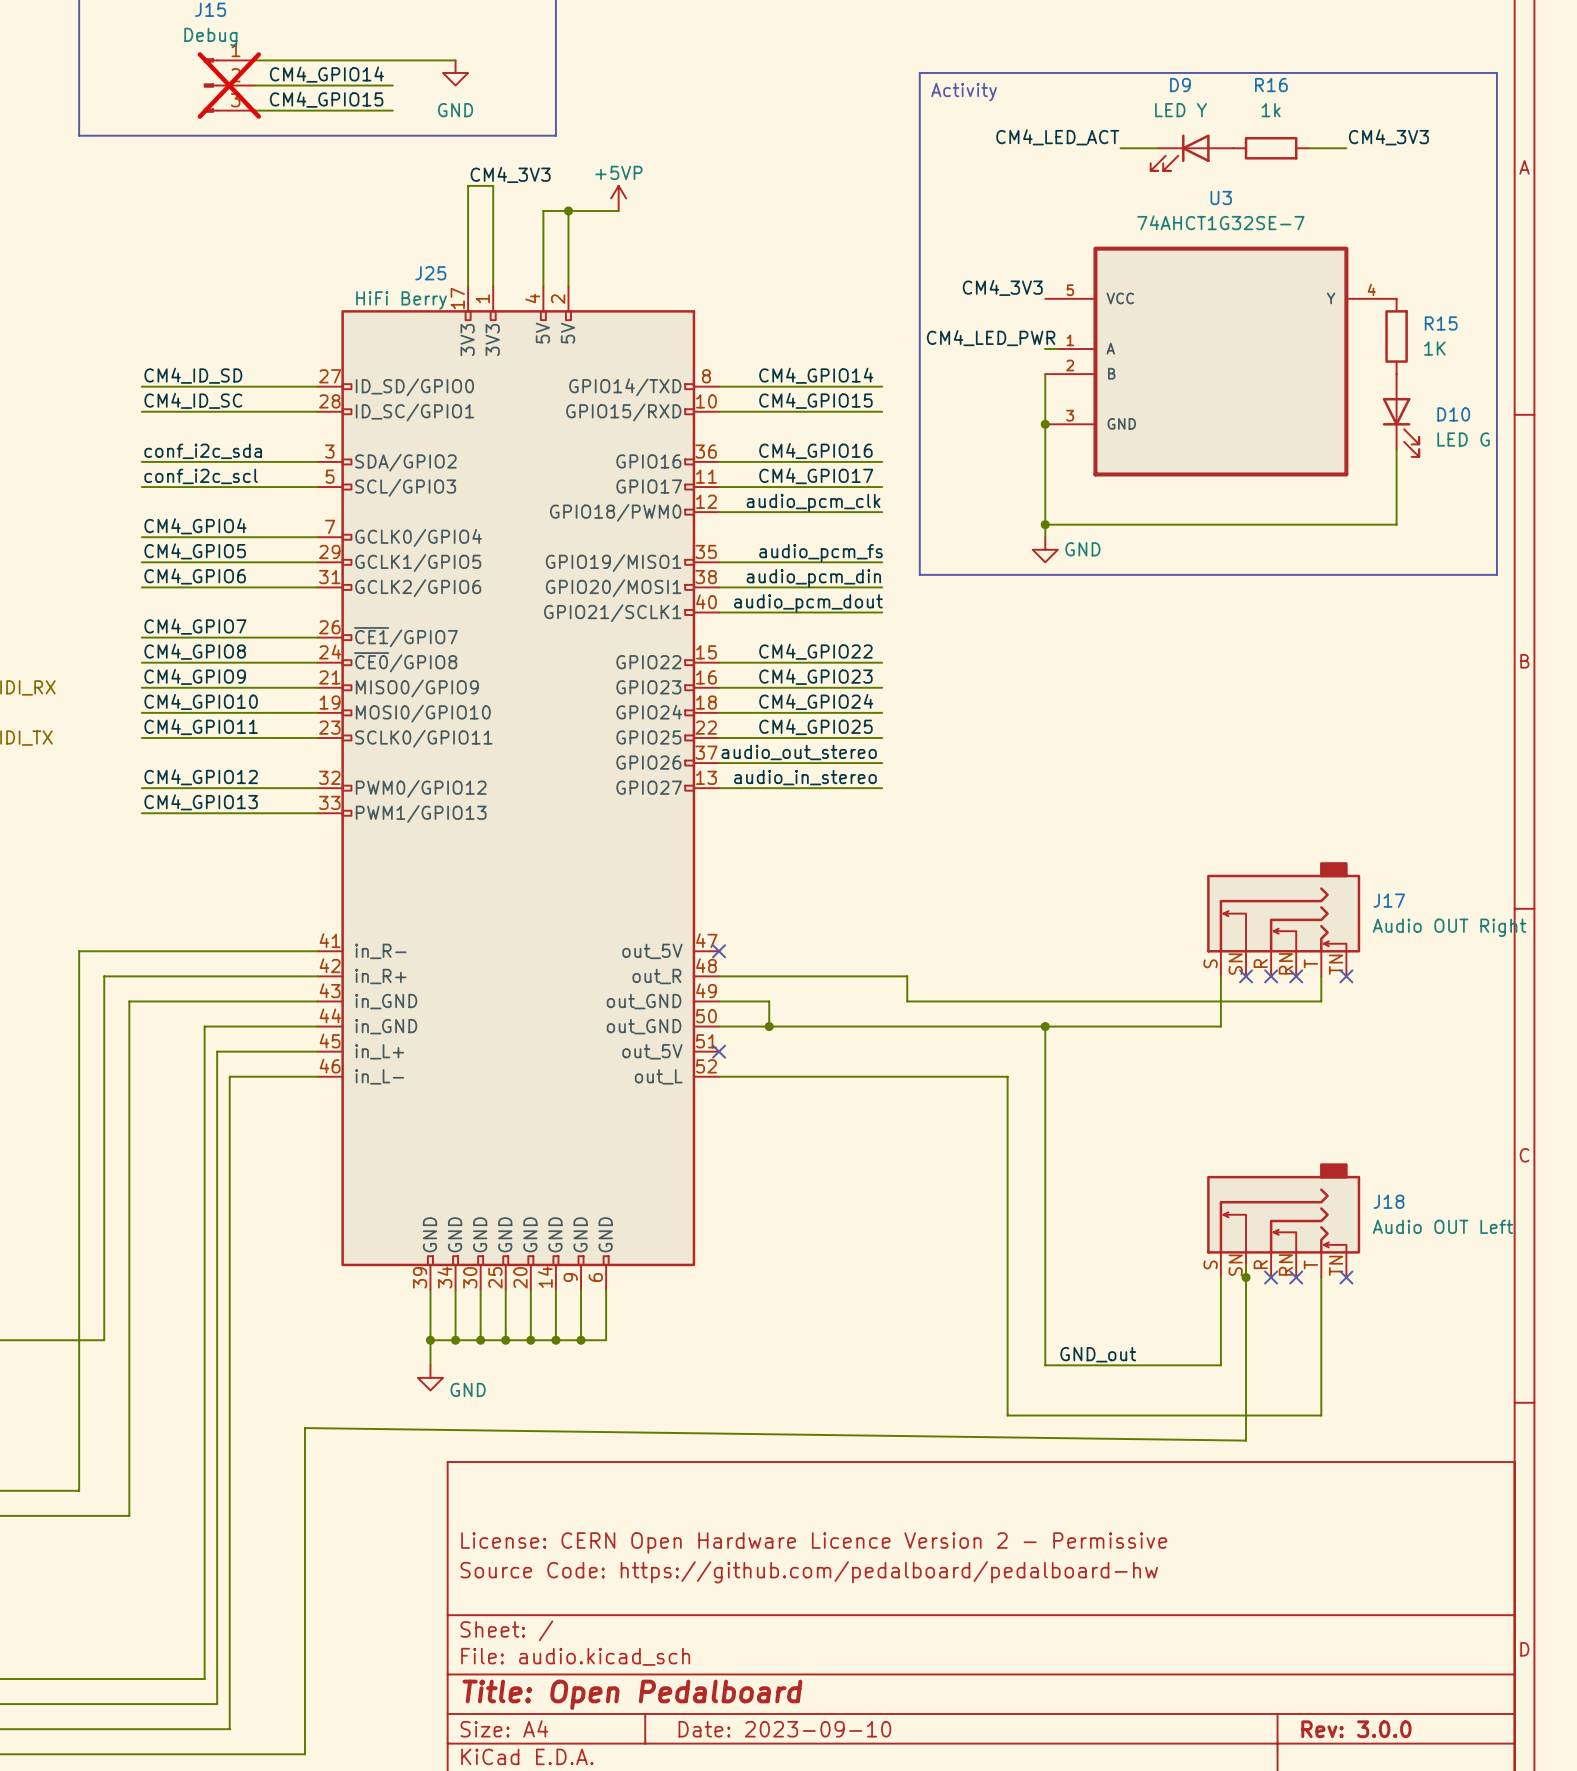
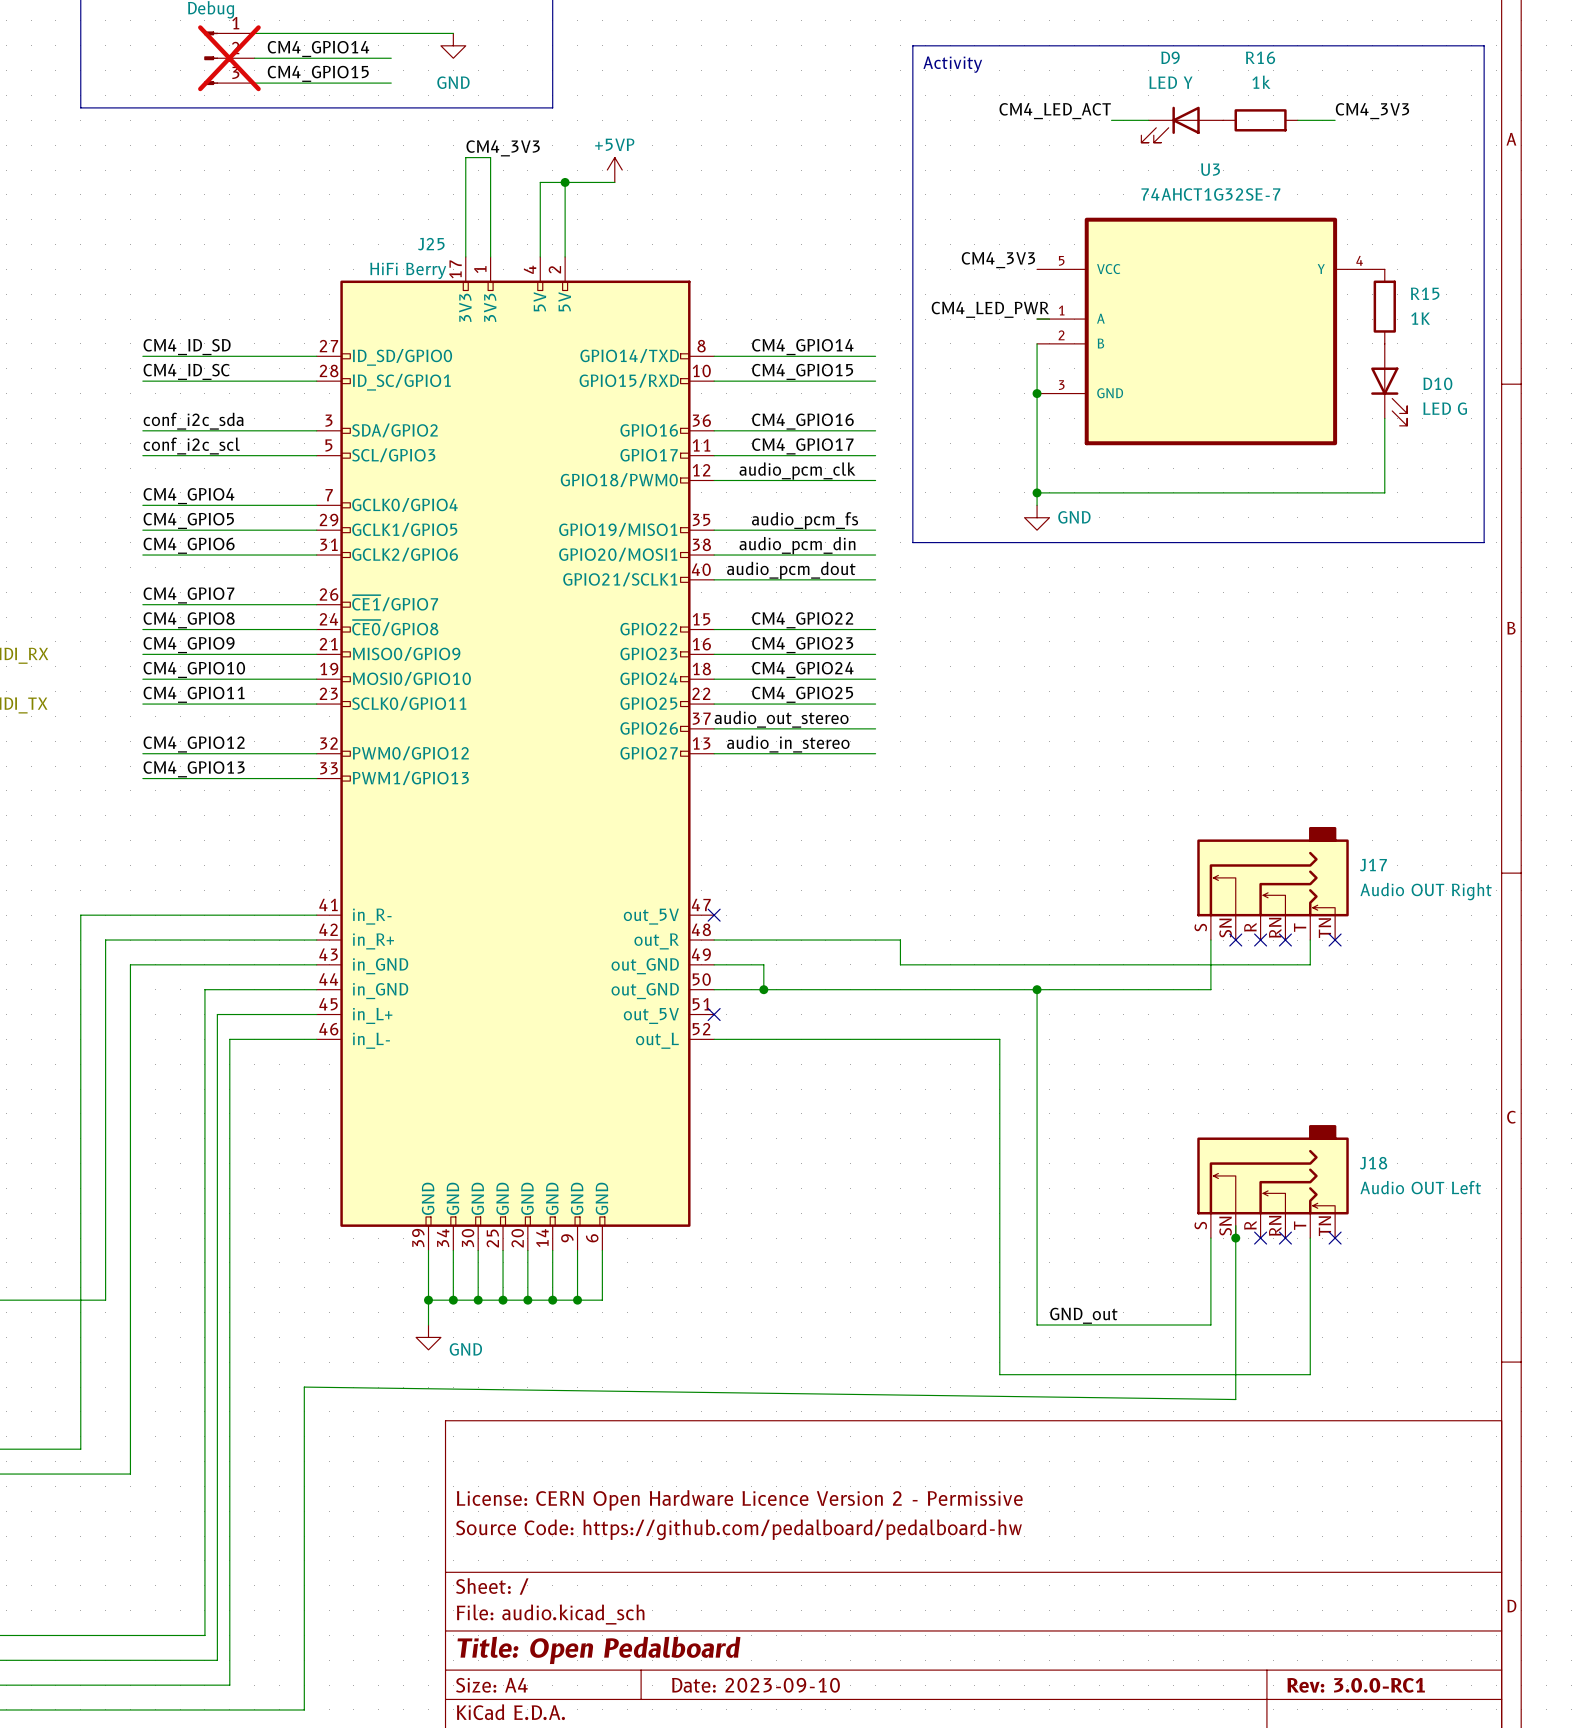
title block: Rev: 3.0.0 (1356, 1729) -> Rev: 3.0.0-RC1 (1356, 1685)

